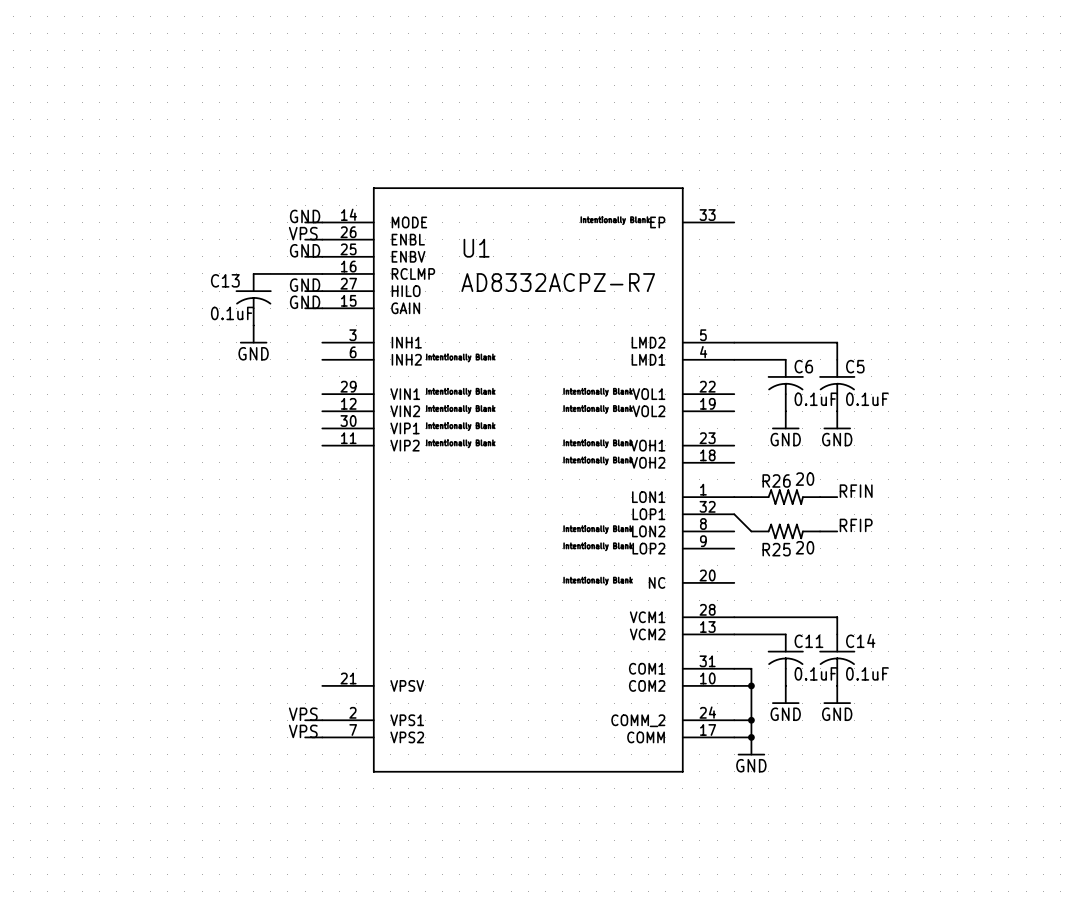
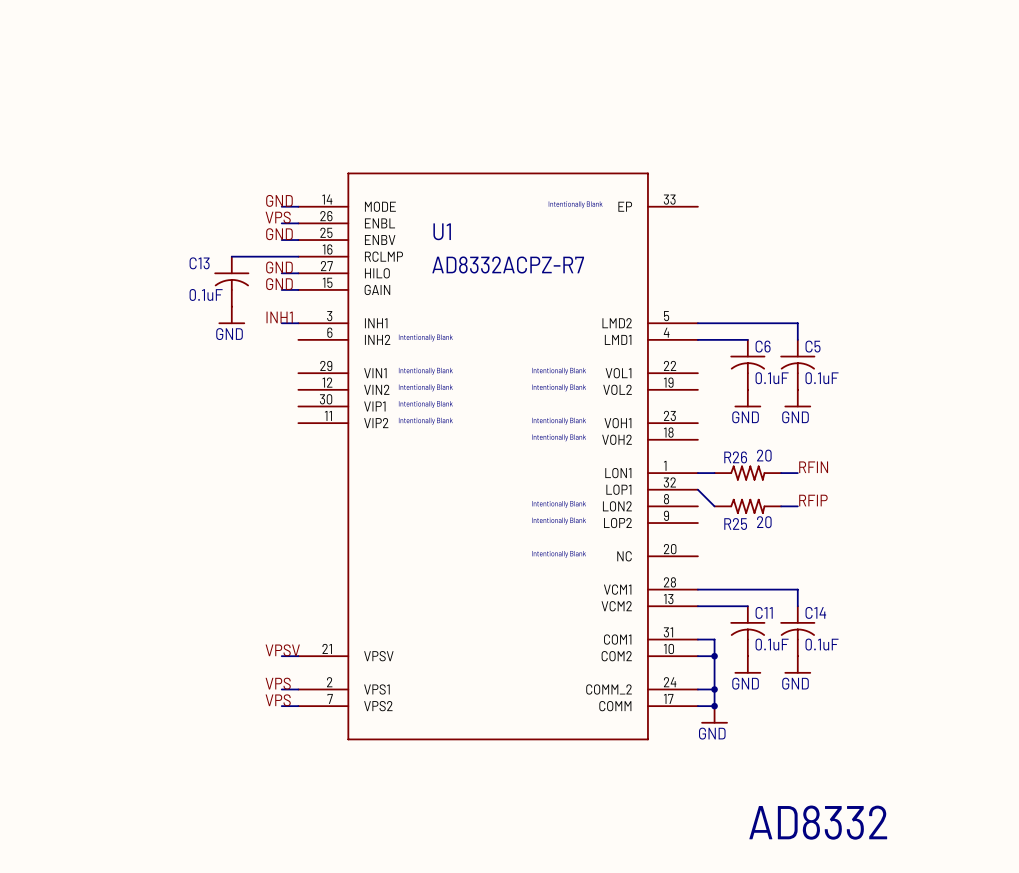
label: none -> INH1 (279, 317)
wire: none -> (281, 323) (298, 323)
label: none -> VPSV (282, 650)
wire: none -> (281, 656) (298, 656)
text: none -> AD8332 (818, 822)

